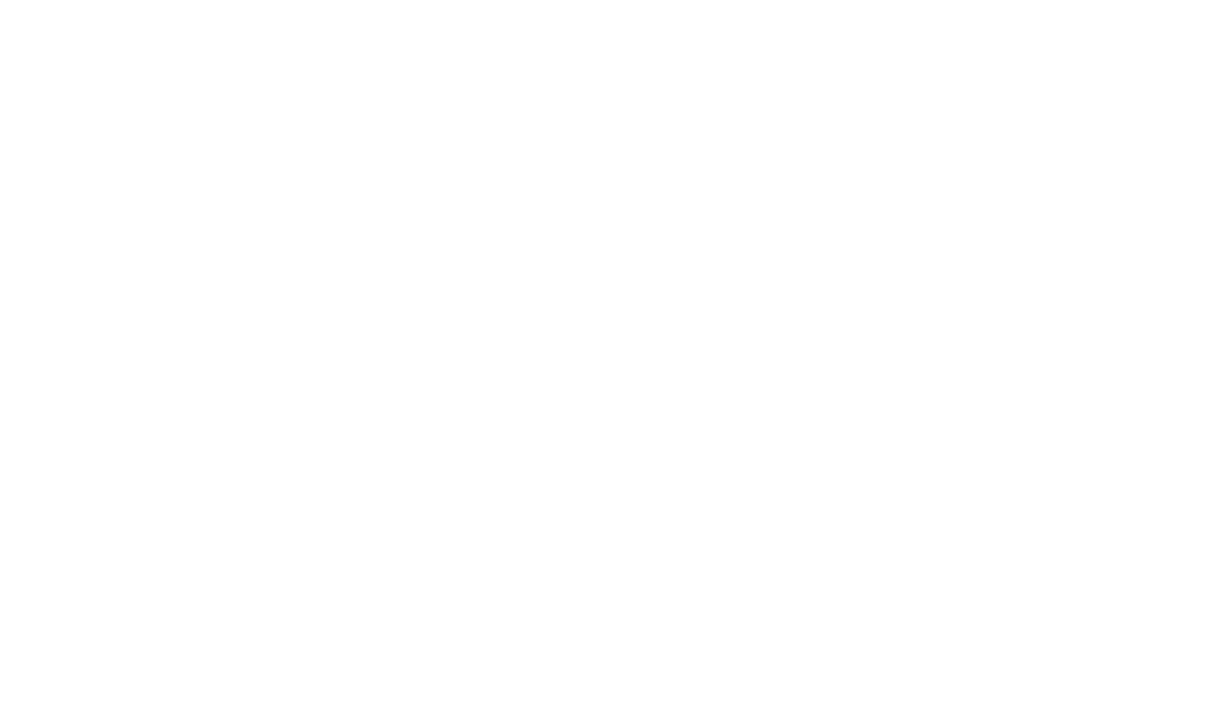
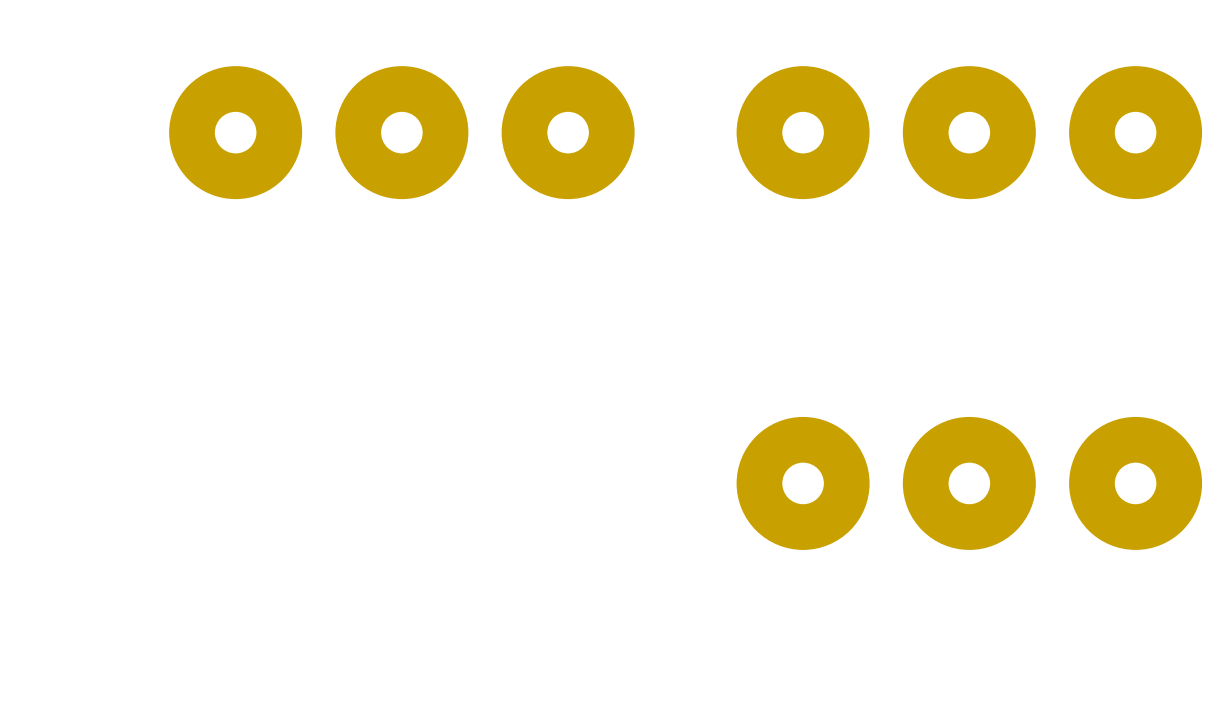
part: none -> (401, 132)
part: none -> (969, 132)
part: none -> (969, 483)

